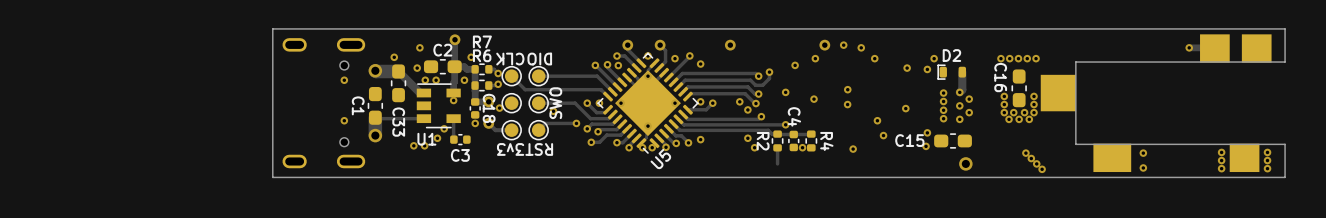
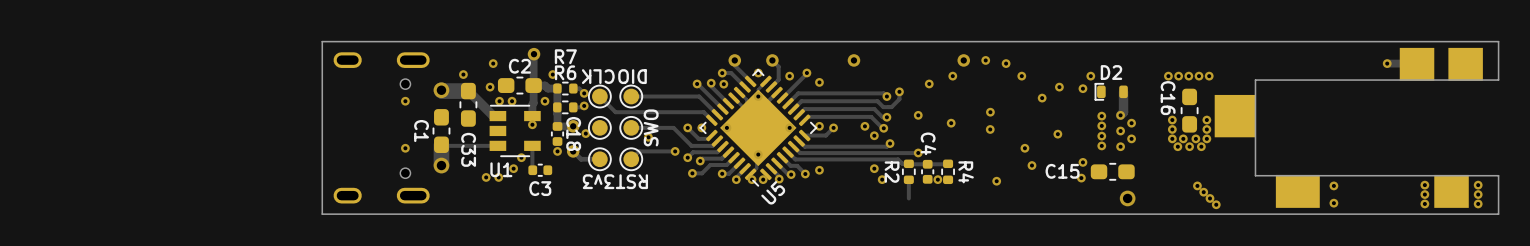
via: none -> (1042, 98)

